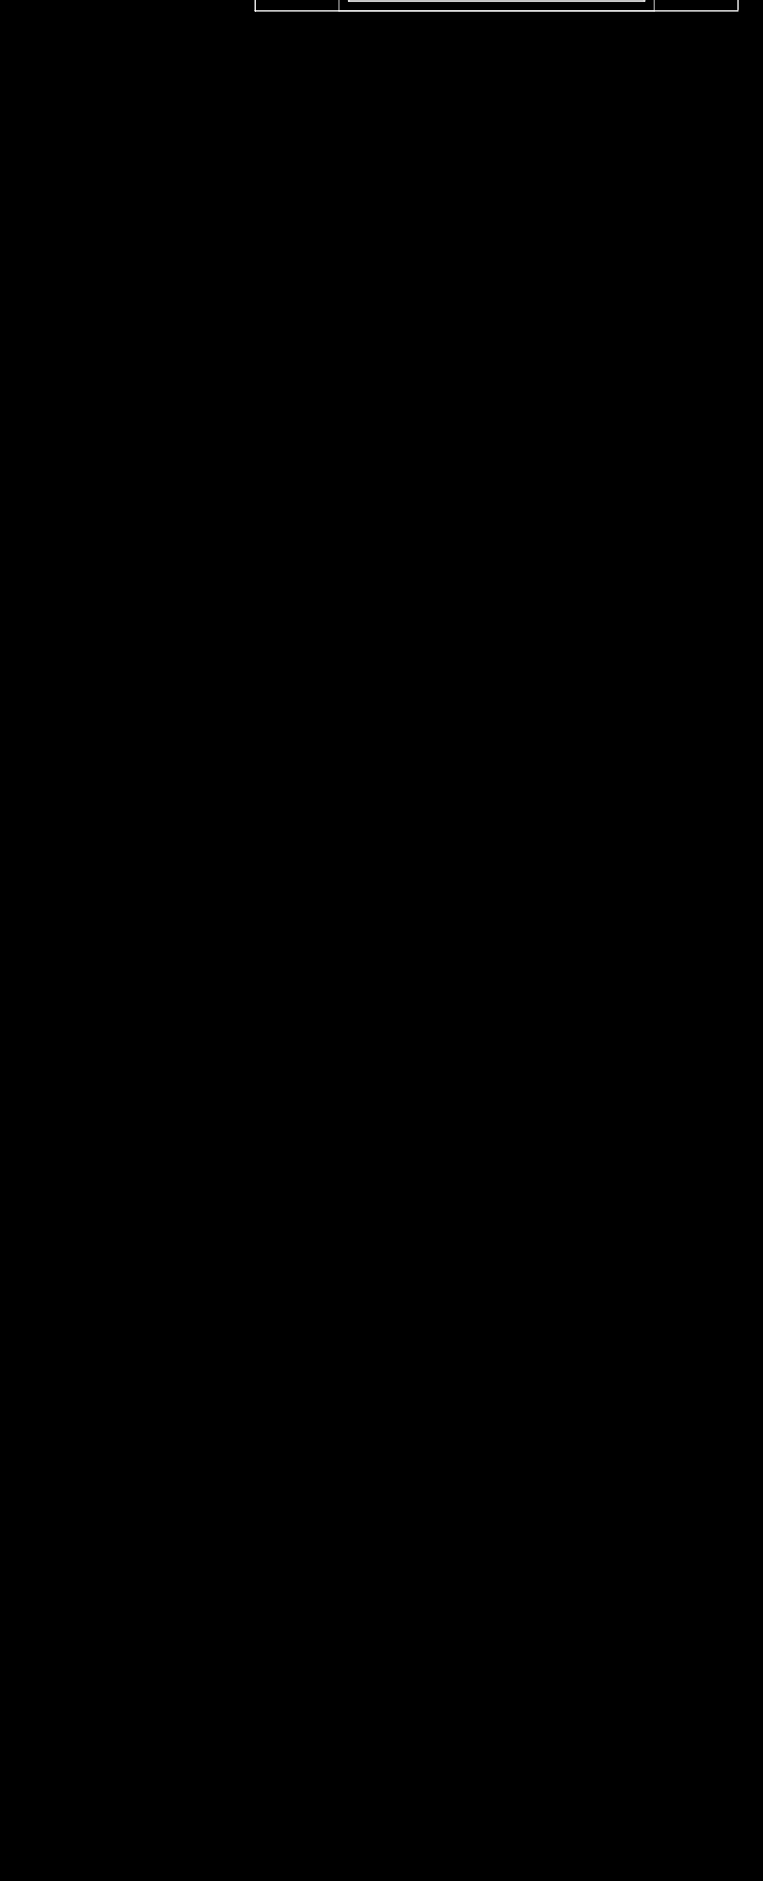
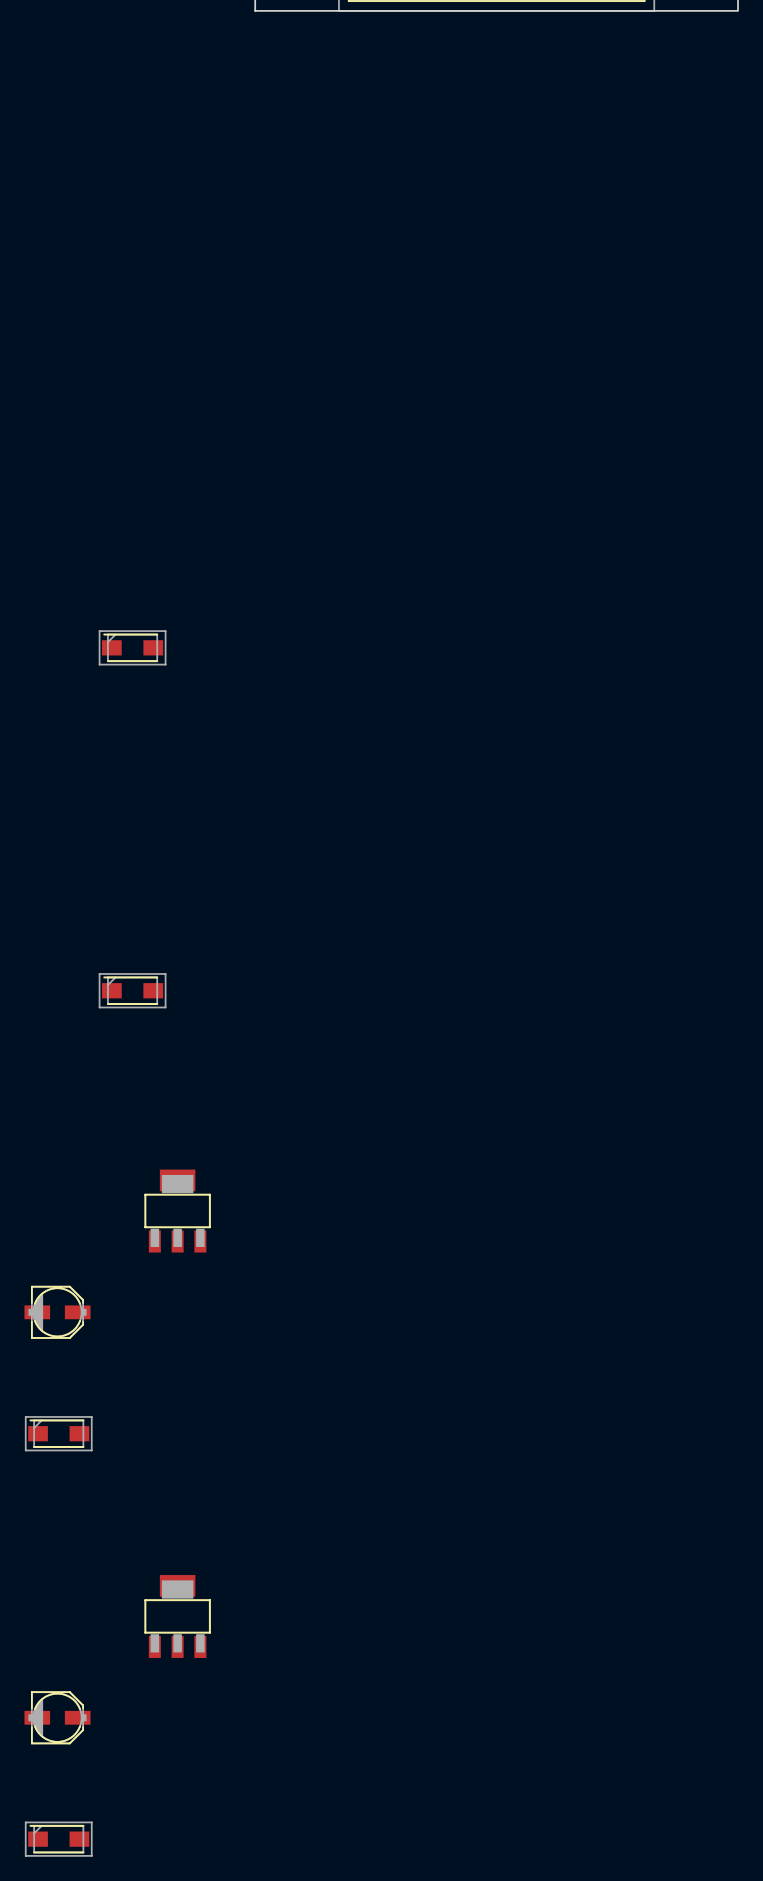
part: none -> (132, 647)
part: none -> (132, 990)
part: none -> (177, 1211)
part: none -> (57, 1312)
part: none -> (58, 1433)
part: none -> (177, 1616)
part: none -> (57, 1717)
part: none -> (58, 1839)

